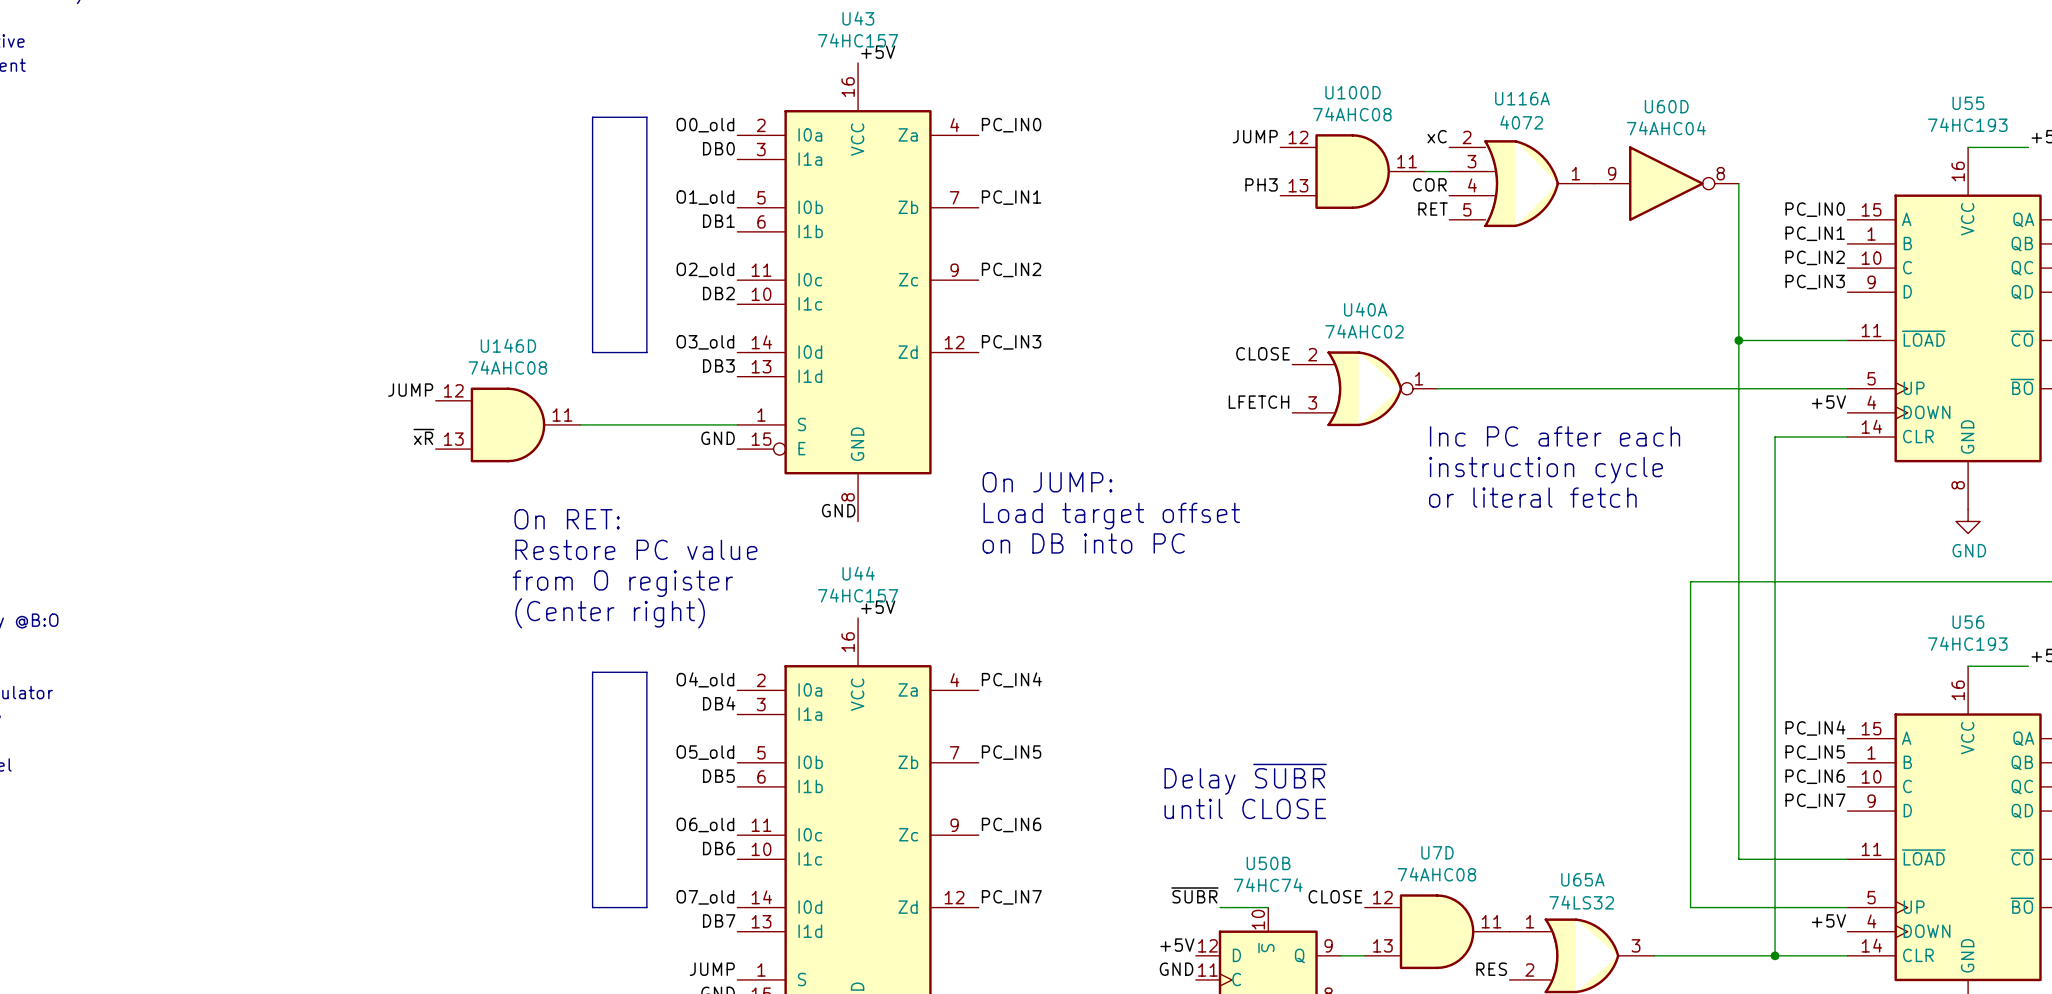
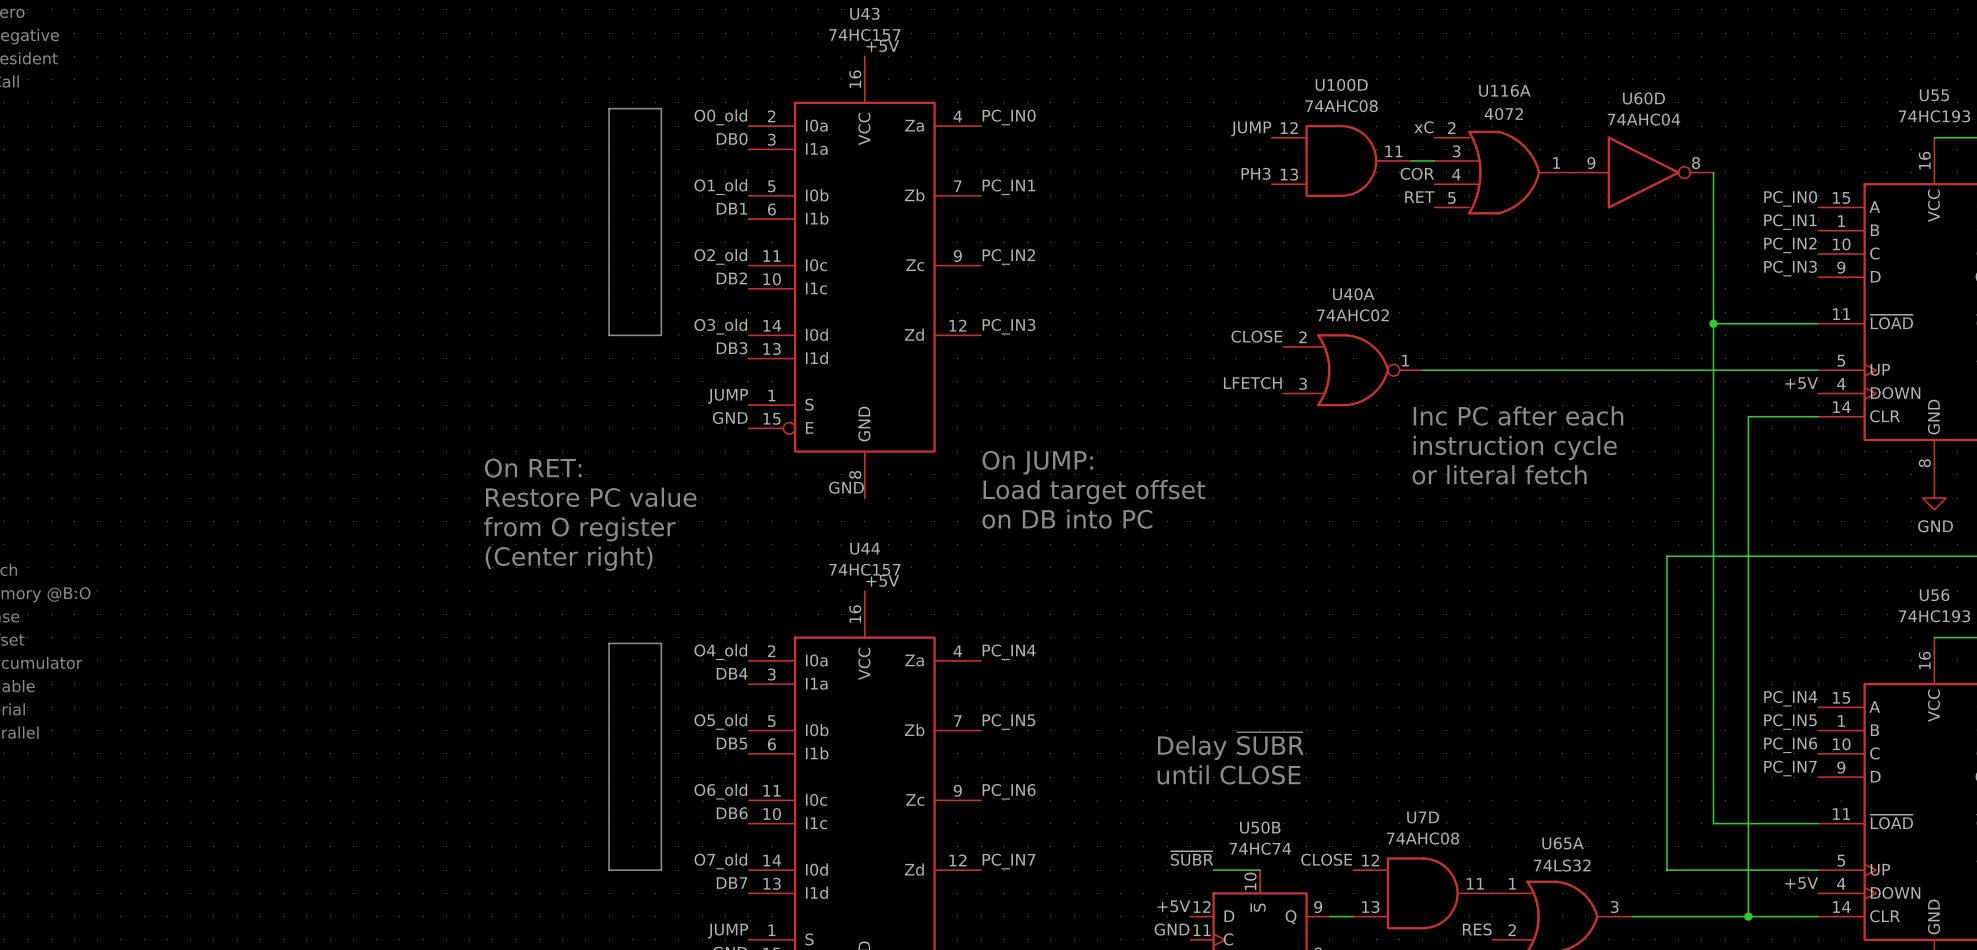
label: JUMP (410, 390) -> none
label: none -> JUMP (728, 396)
U146D: 74AHC08 (508, 424) -> none
wire: (580, 424) (737, 424) -> none
label: ~{xR} (423, 436) -> none
text position: On RET: (567, 519) -> On RET: (533, 468)
text position: Restore PC value (636, 549) -> Restore PC value (591, 497)
text position: from O register (622, 583) -> from O register (579, 529)
text position: (Center right) (610, 613) -> (Center right) (569, 558)

